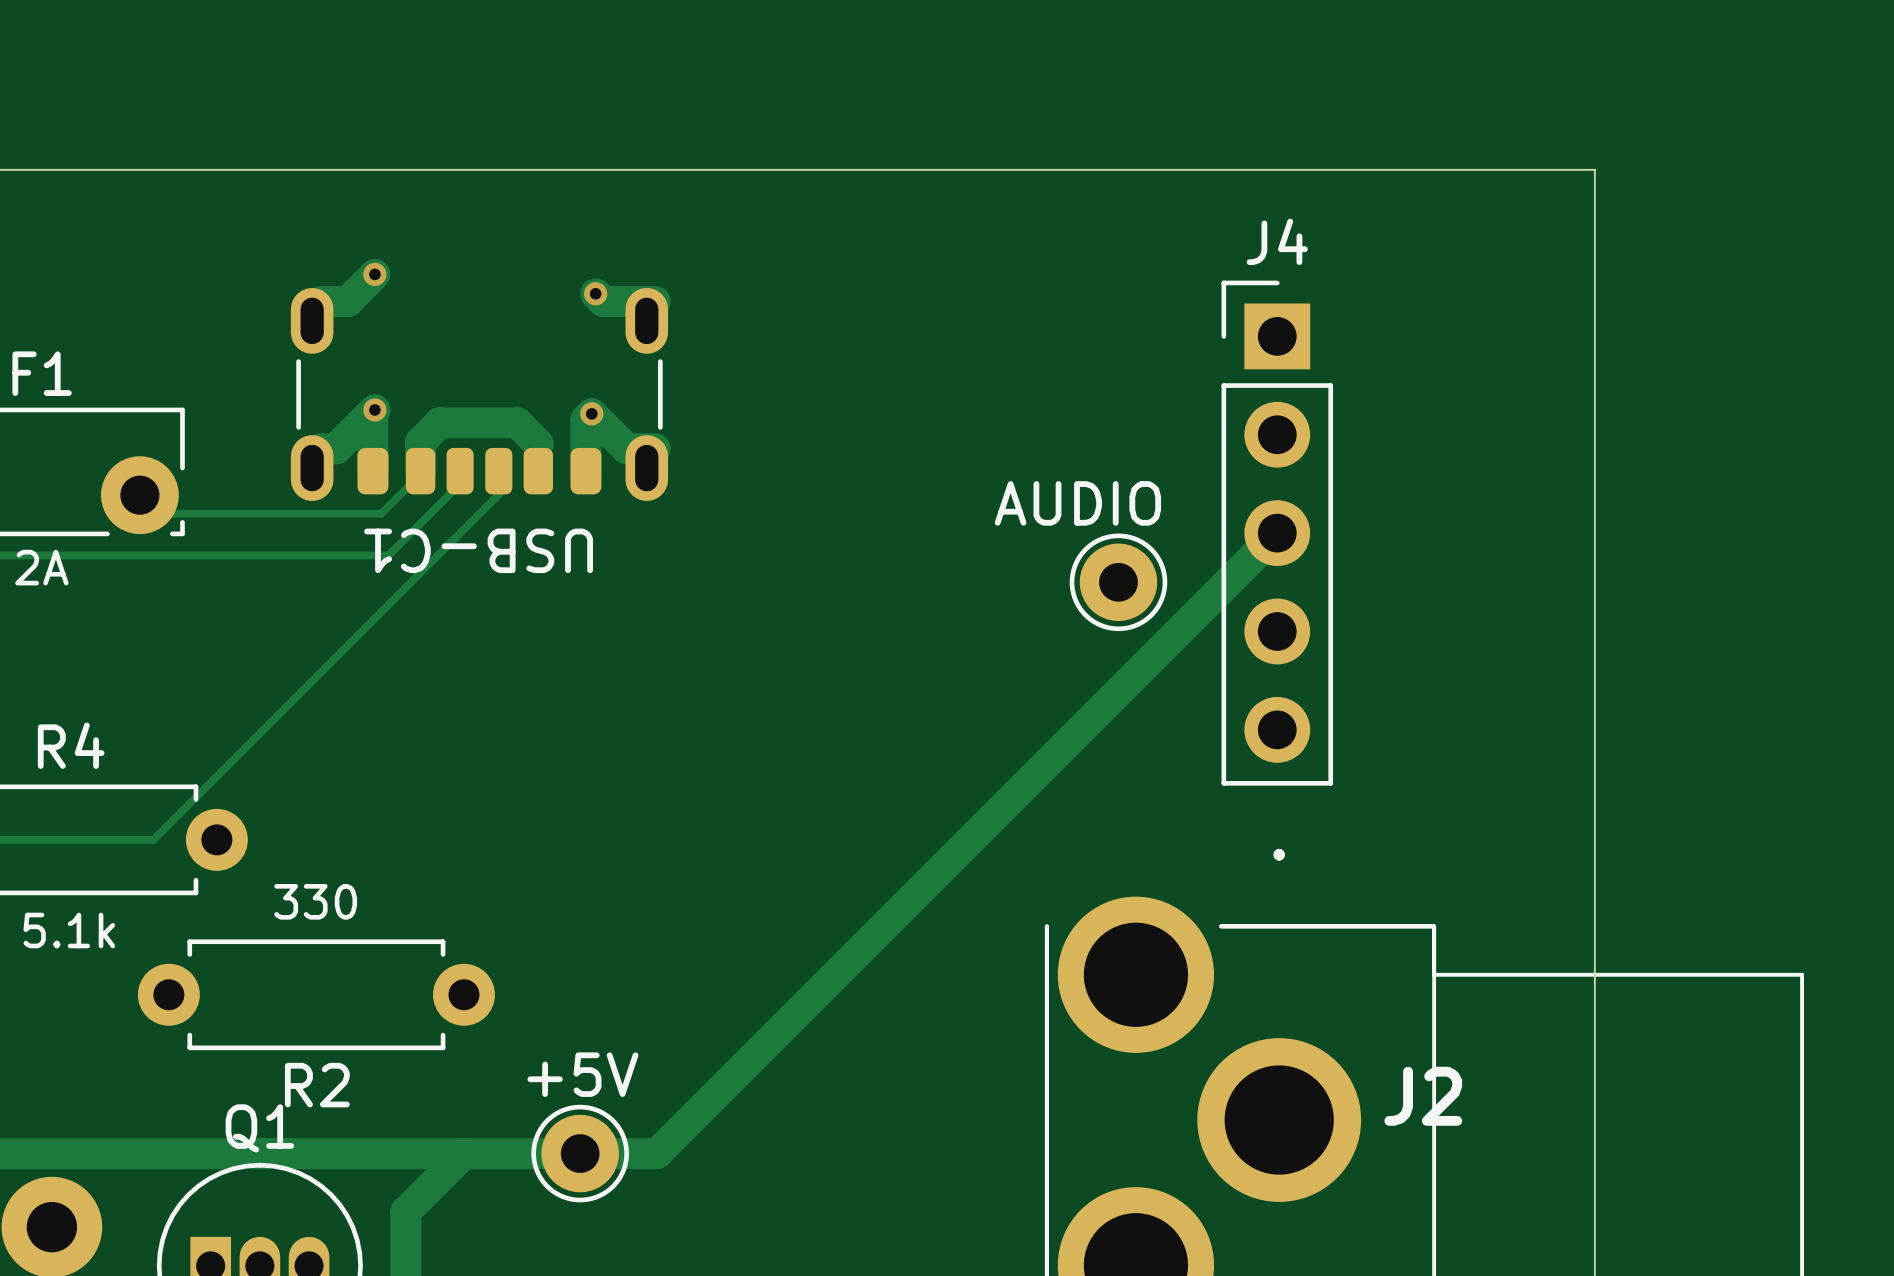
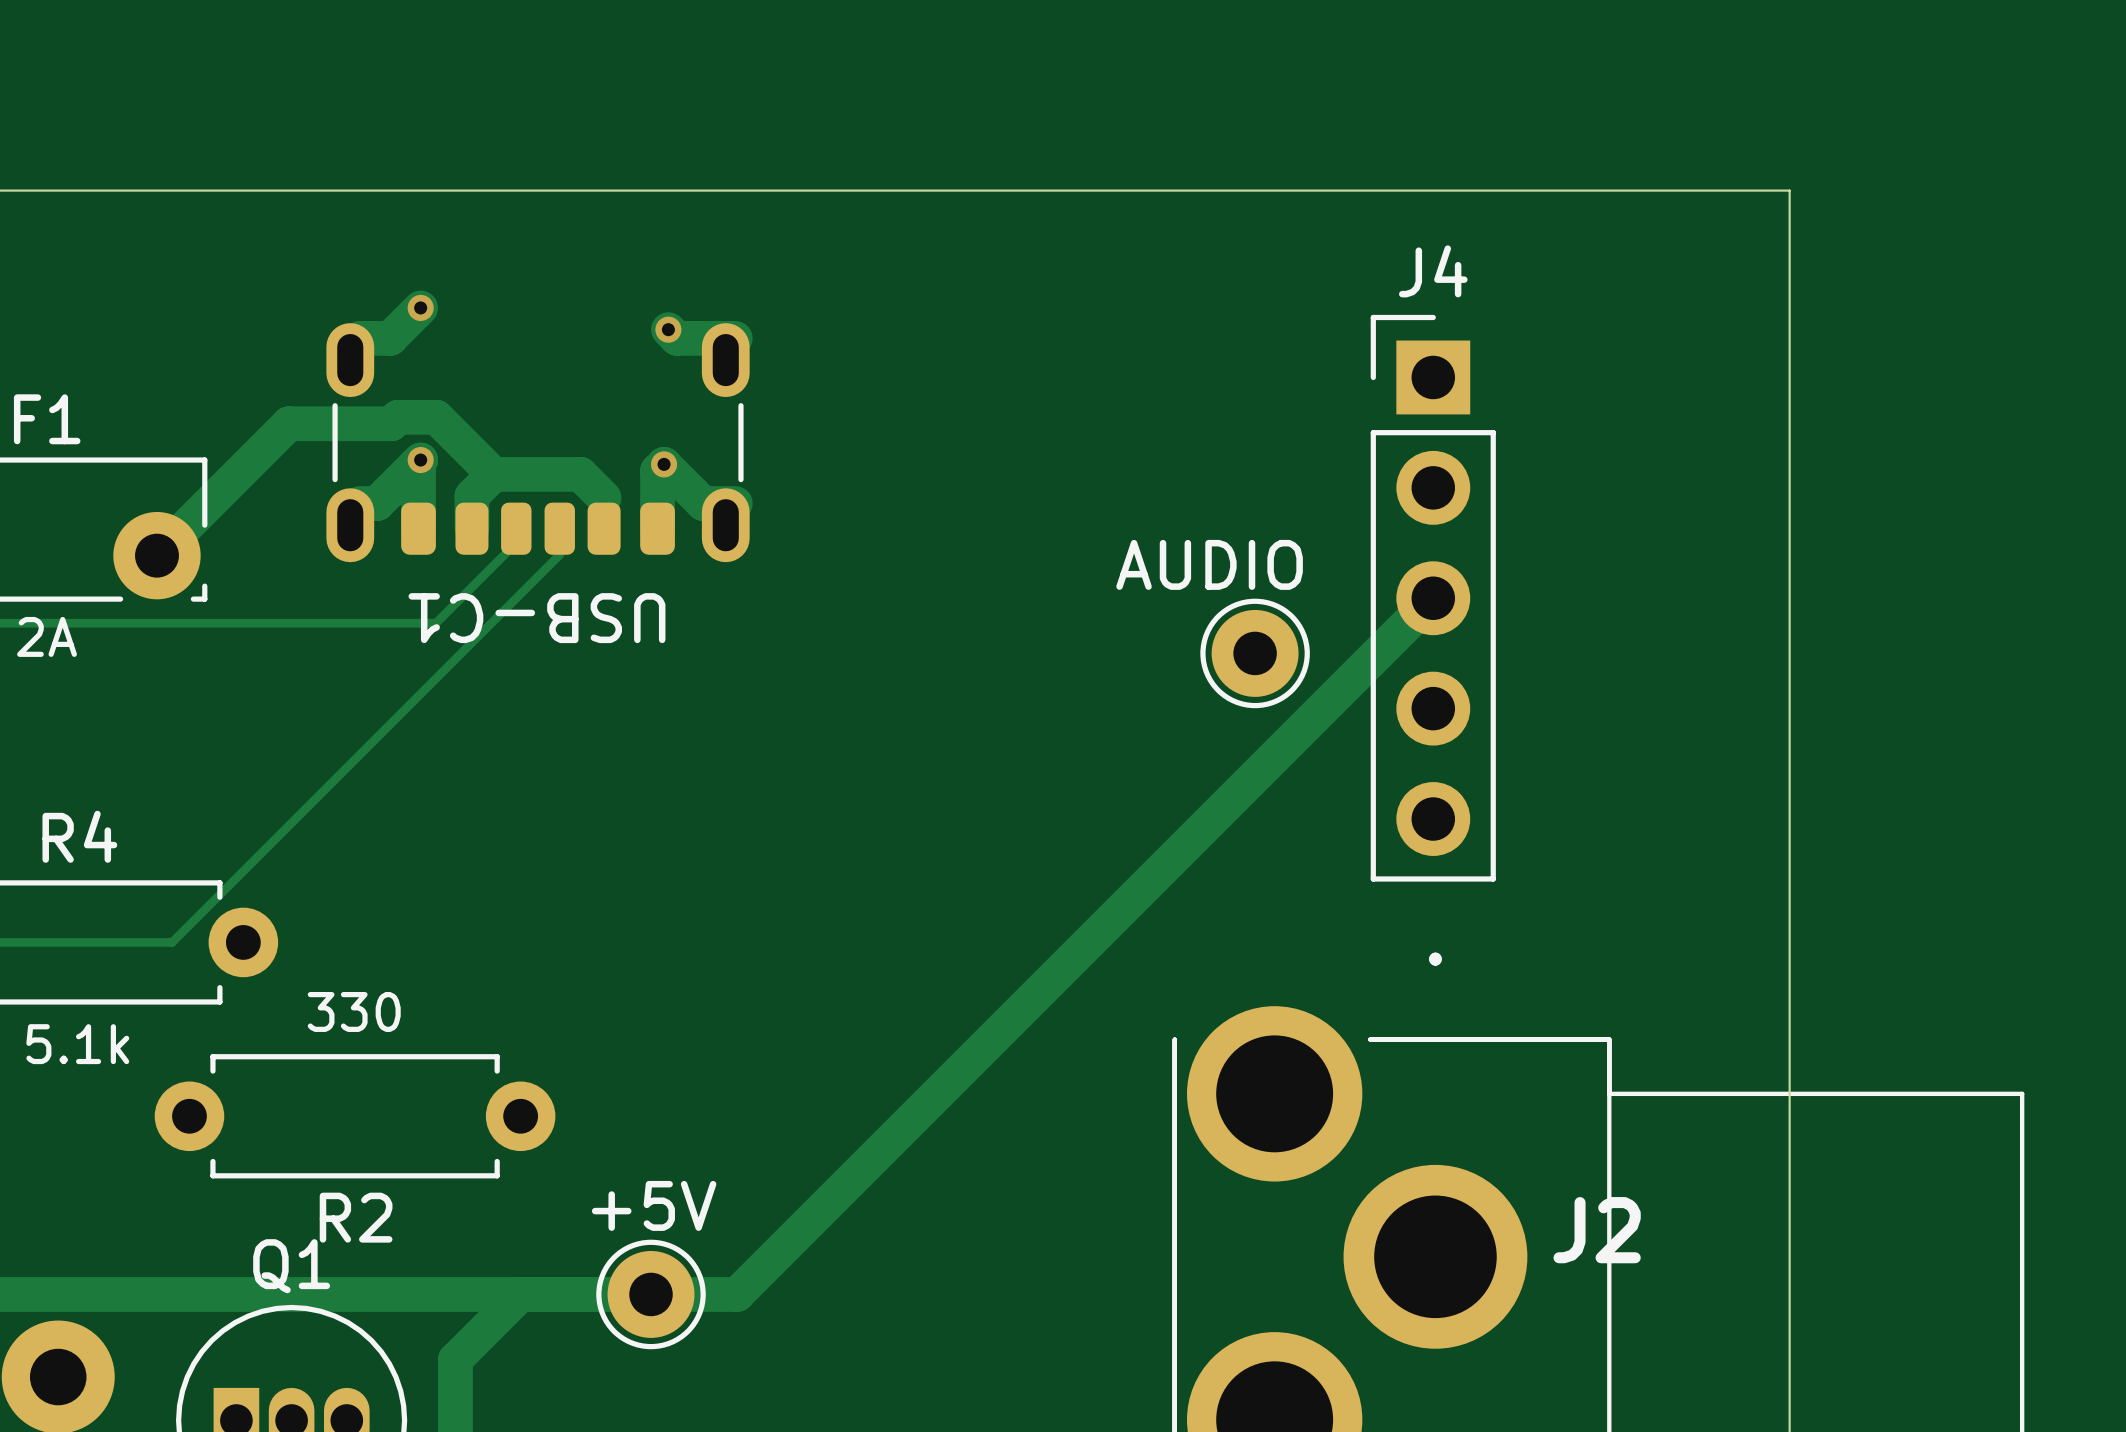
track: none -> (493, 474) (436, 417) (397, 417) (391, 423) (288, 423) (156, 555)
track: (420, 474) (381, 513) (158, 513) -> none

